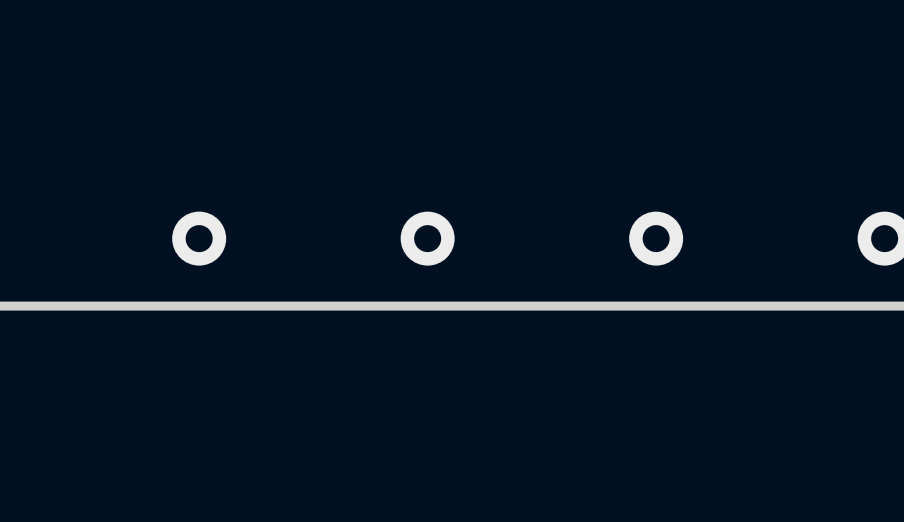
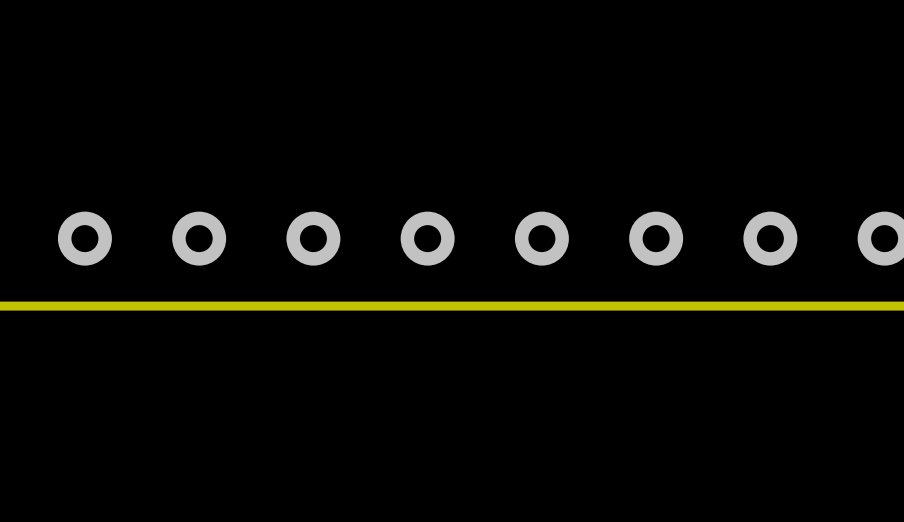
via: none -> (84, 238)
via: none -> (313, 238)
via: none -> (541, 238)
via: none -> (770, 238)

